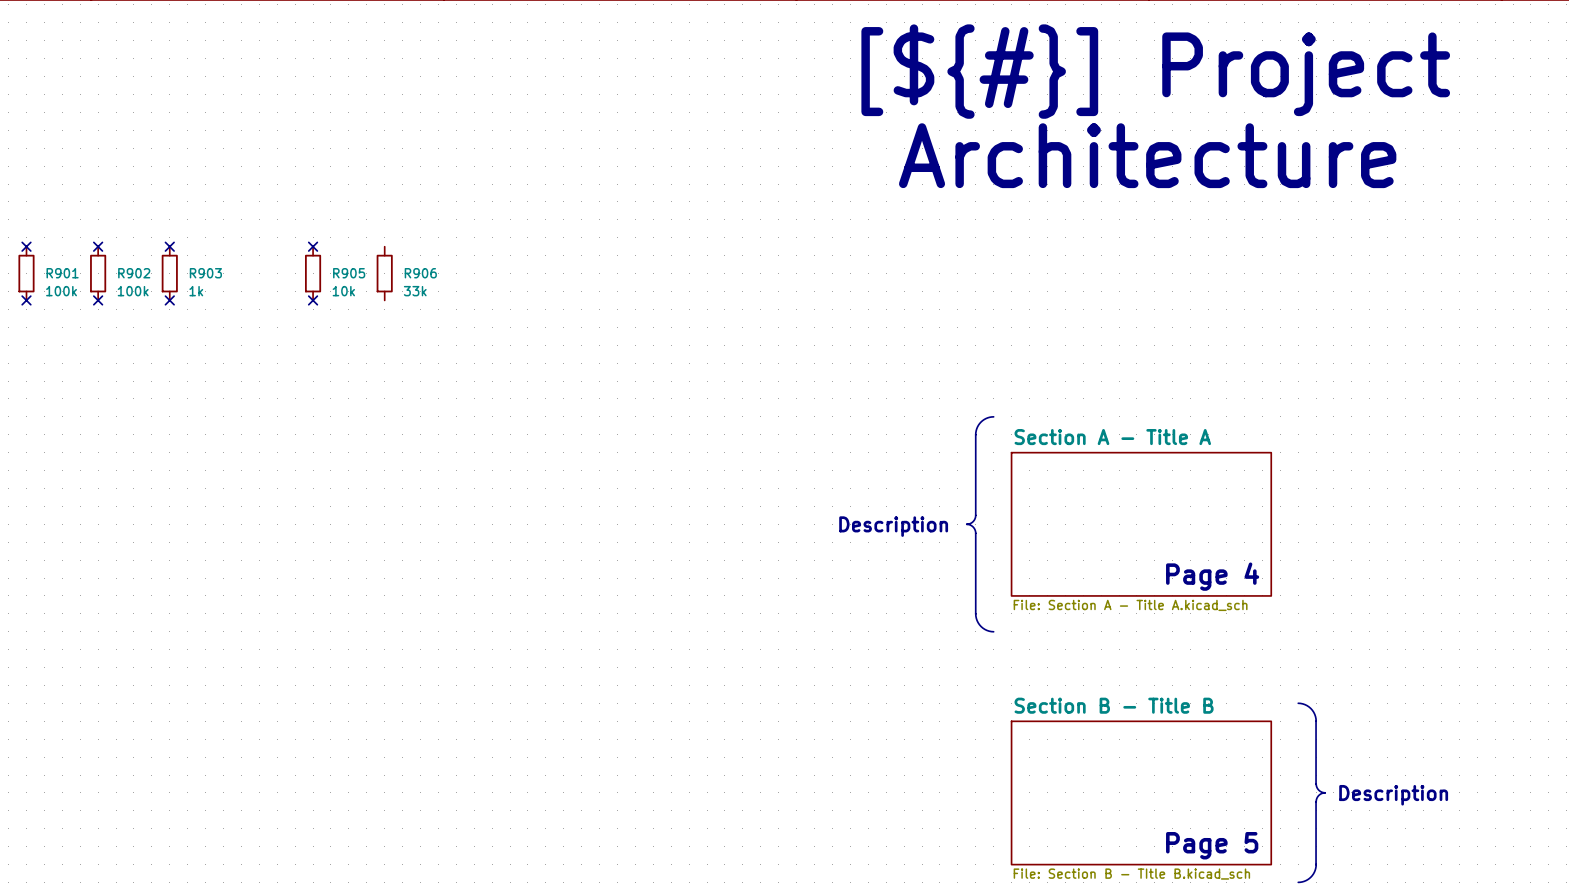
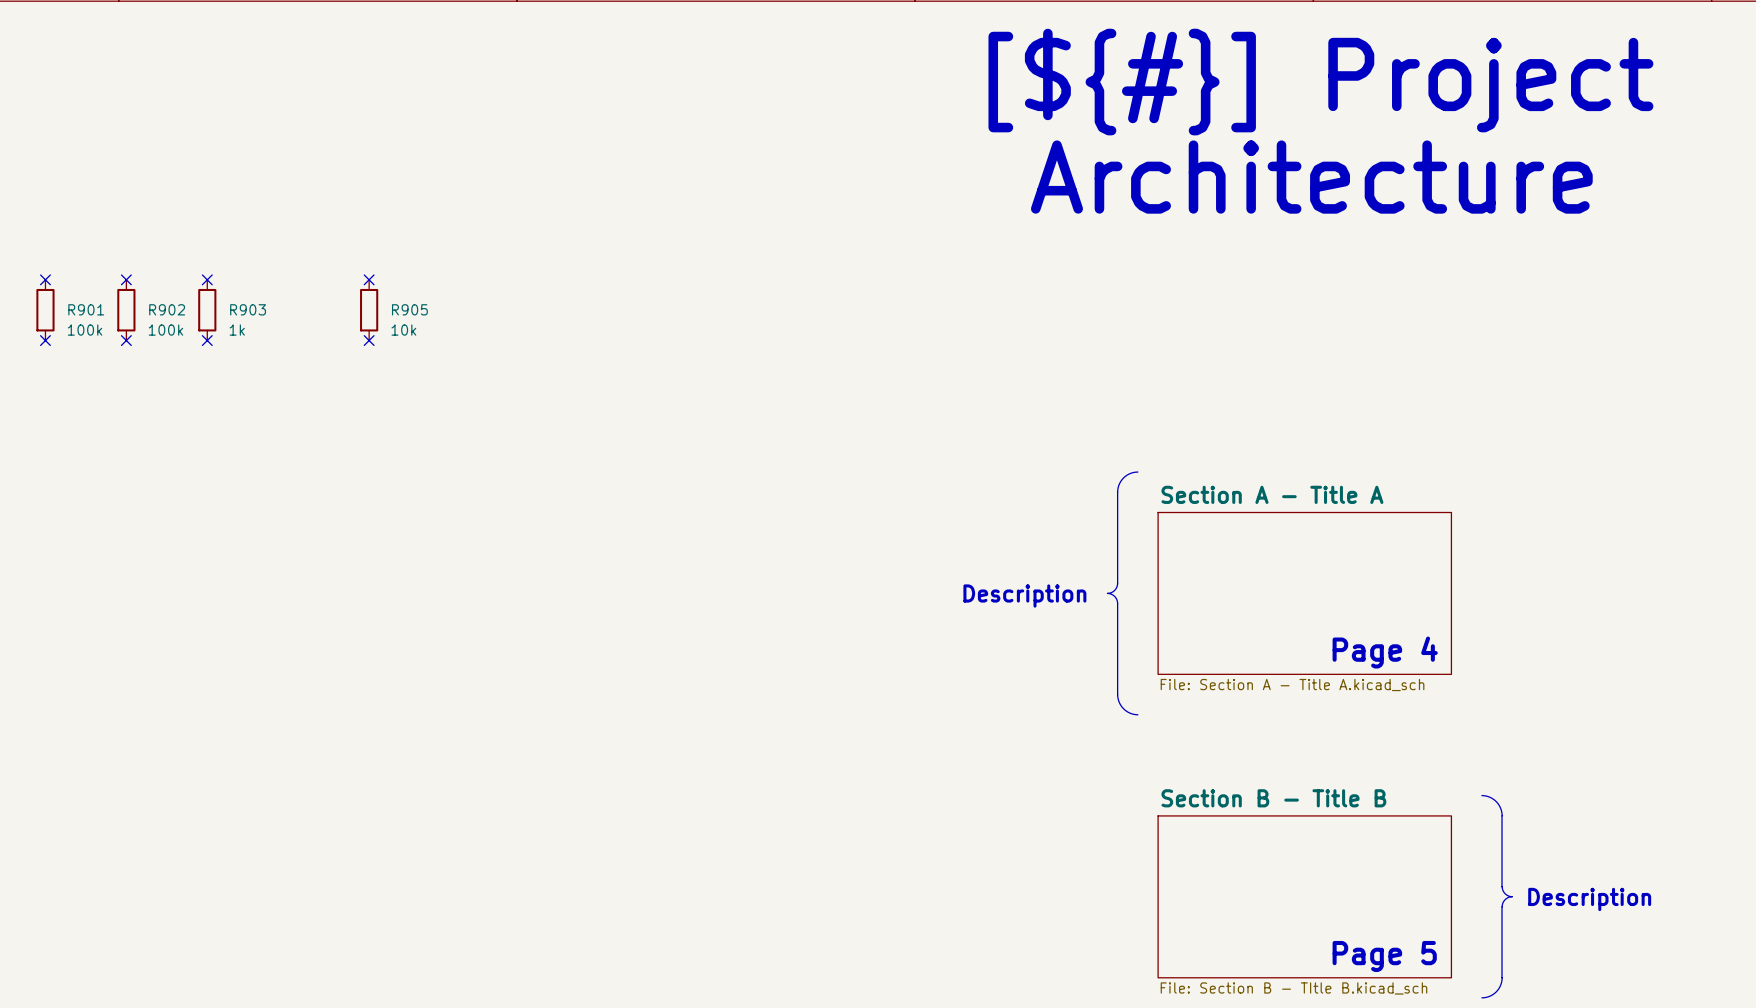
R906: 33k (384, 273) -> none

